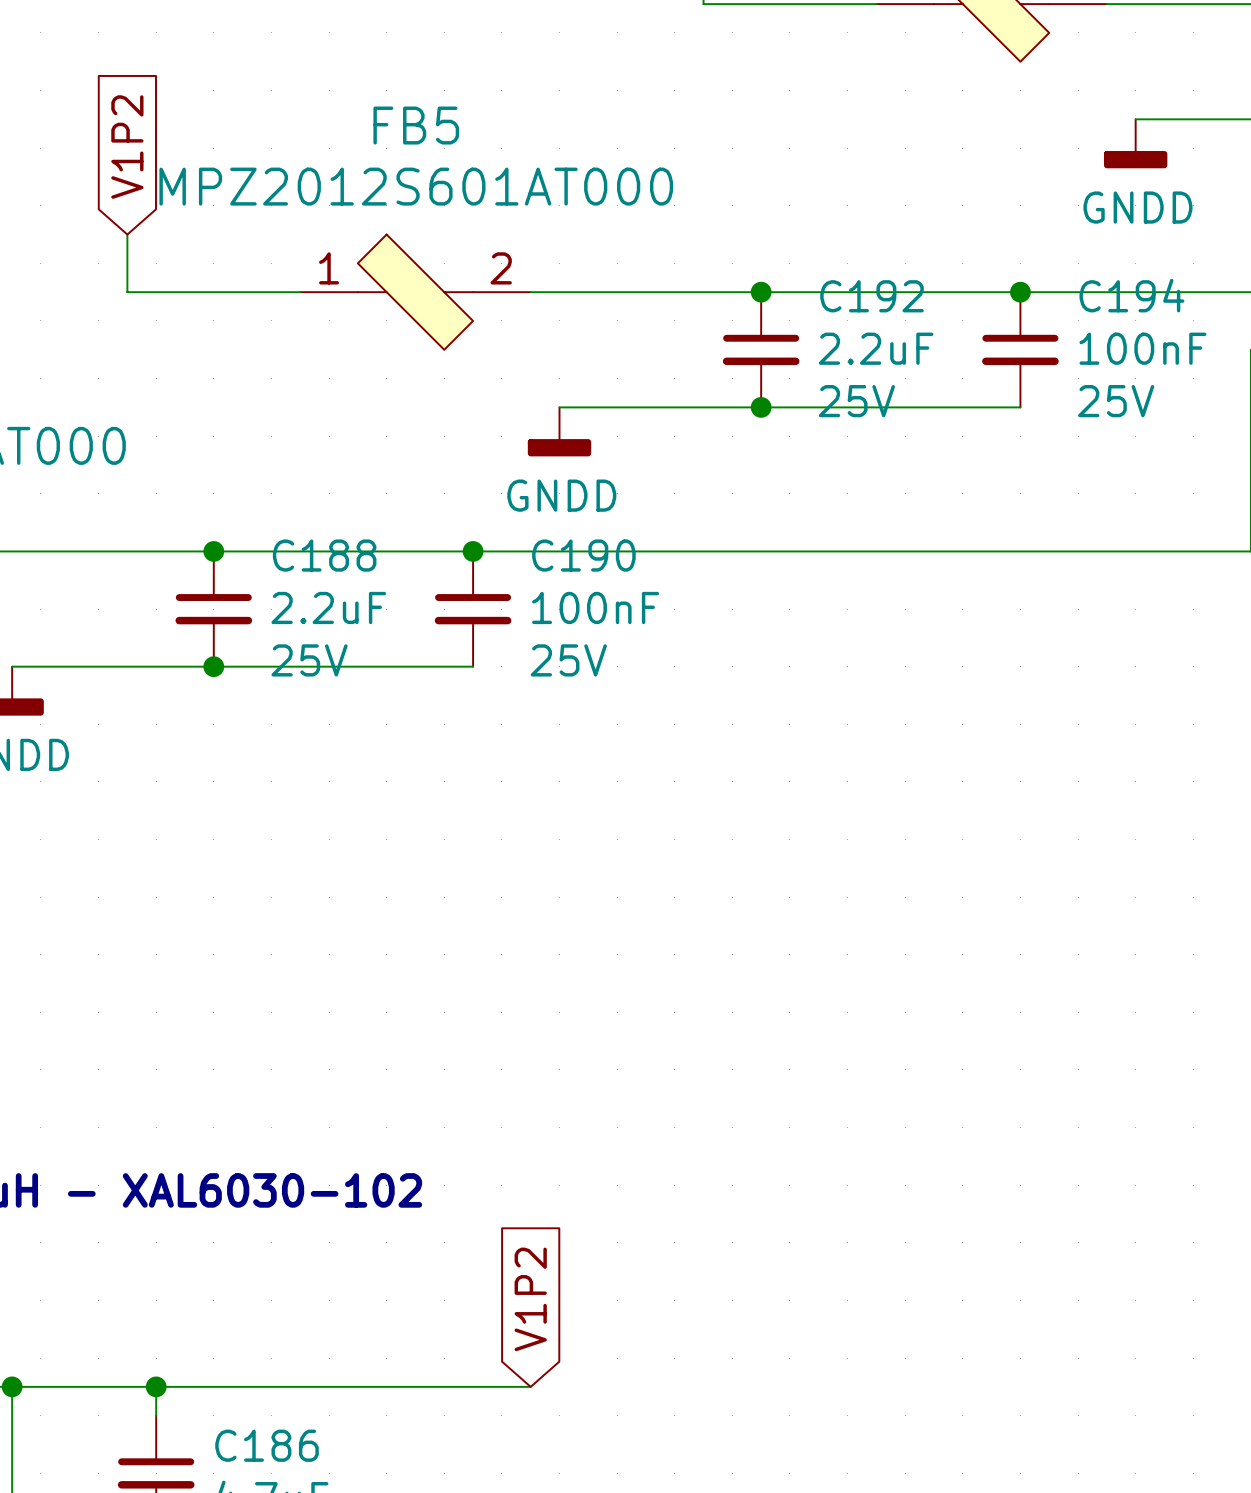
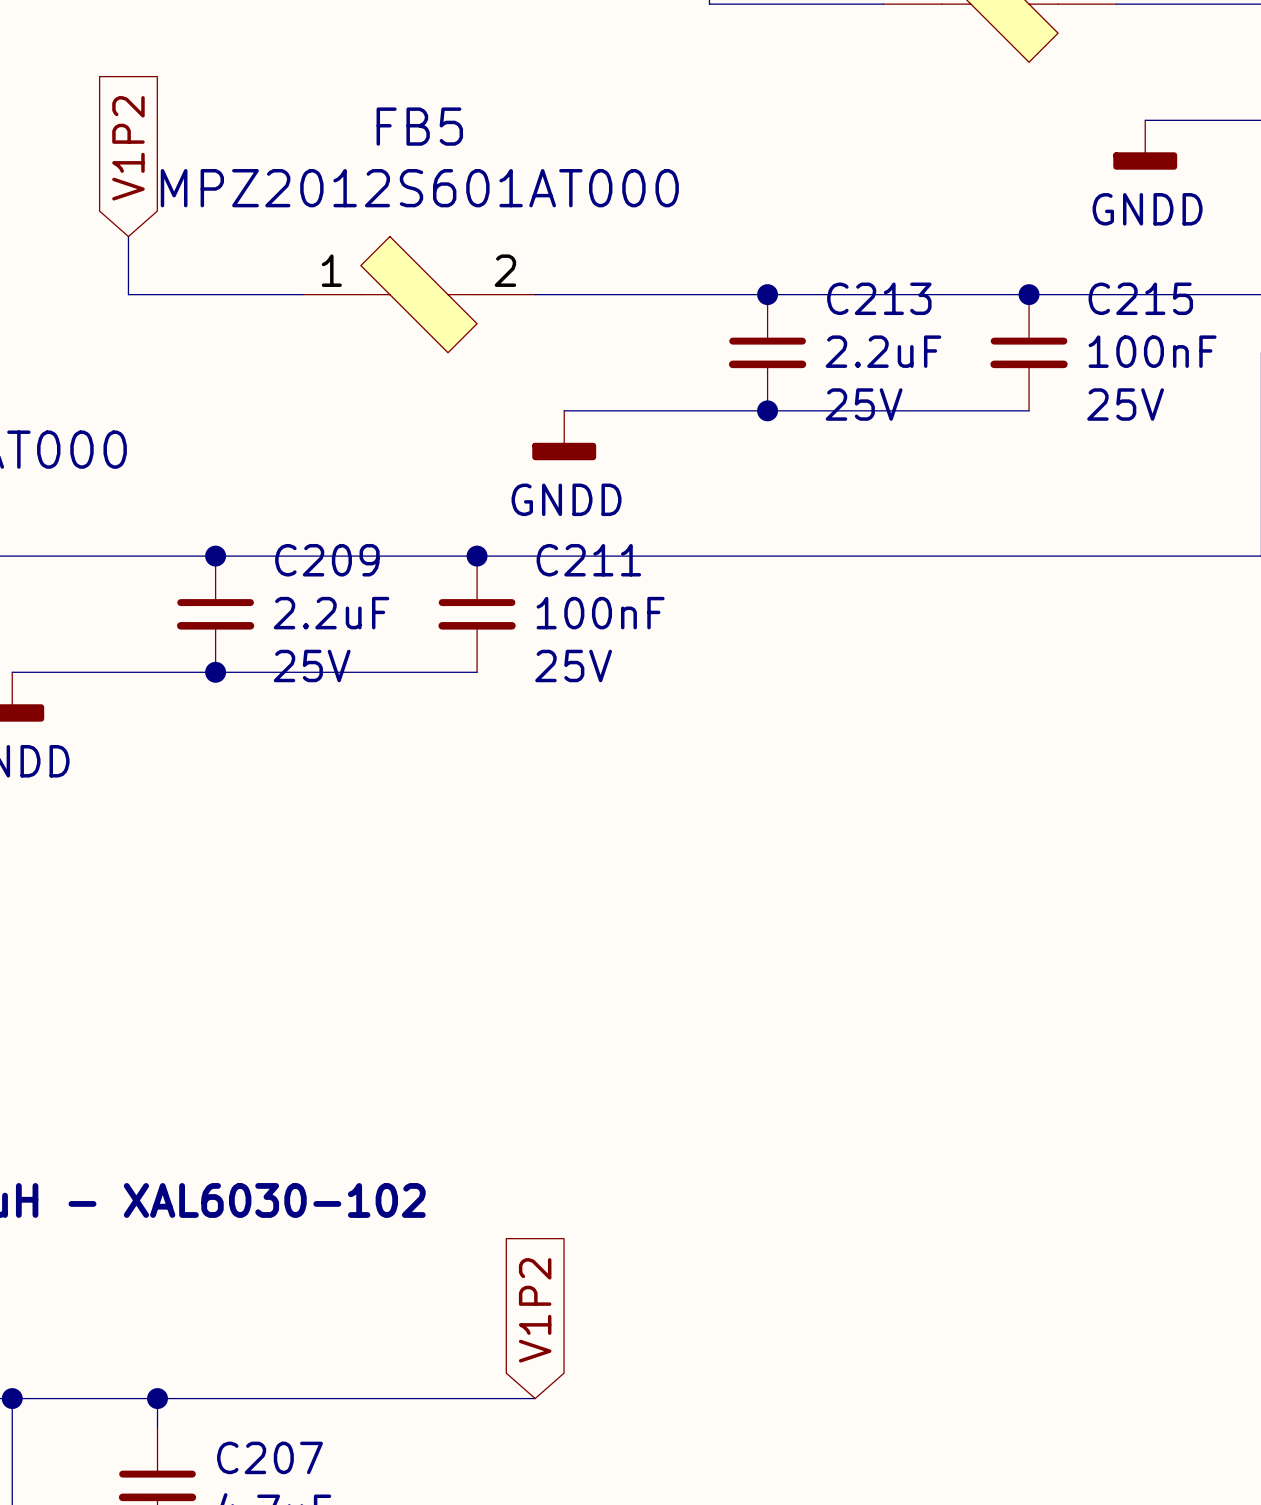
C194 name: C194 (1131, 295) -> C215 (1140, 298)
C192 name: C192 (872, 296) -> C213 (879, 298)
C188 name: C188 (324, 555) -> C209 (327, 560)
C190 name: C190 (583, 555) -> C211 (588, 560)
C186 name: C186 (267, 1445) -> C207 (269, 1457)

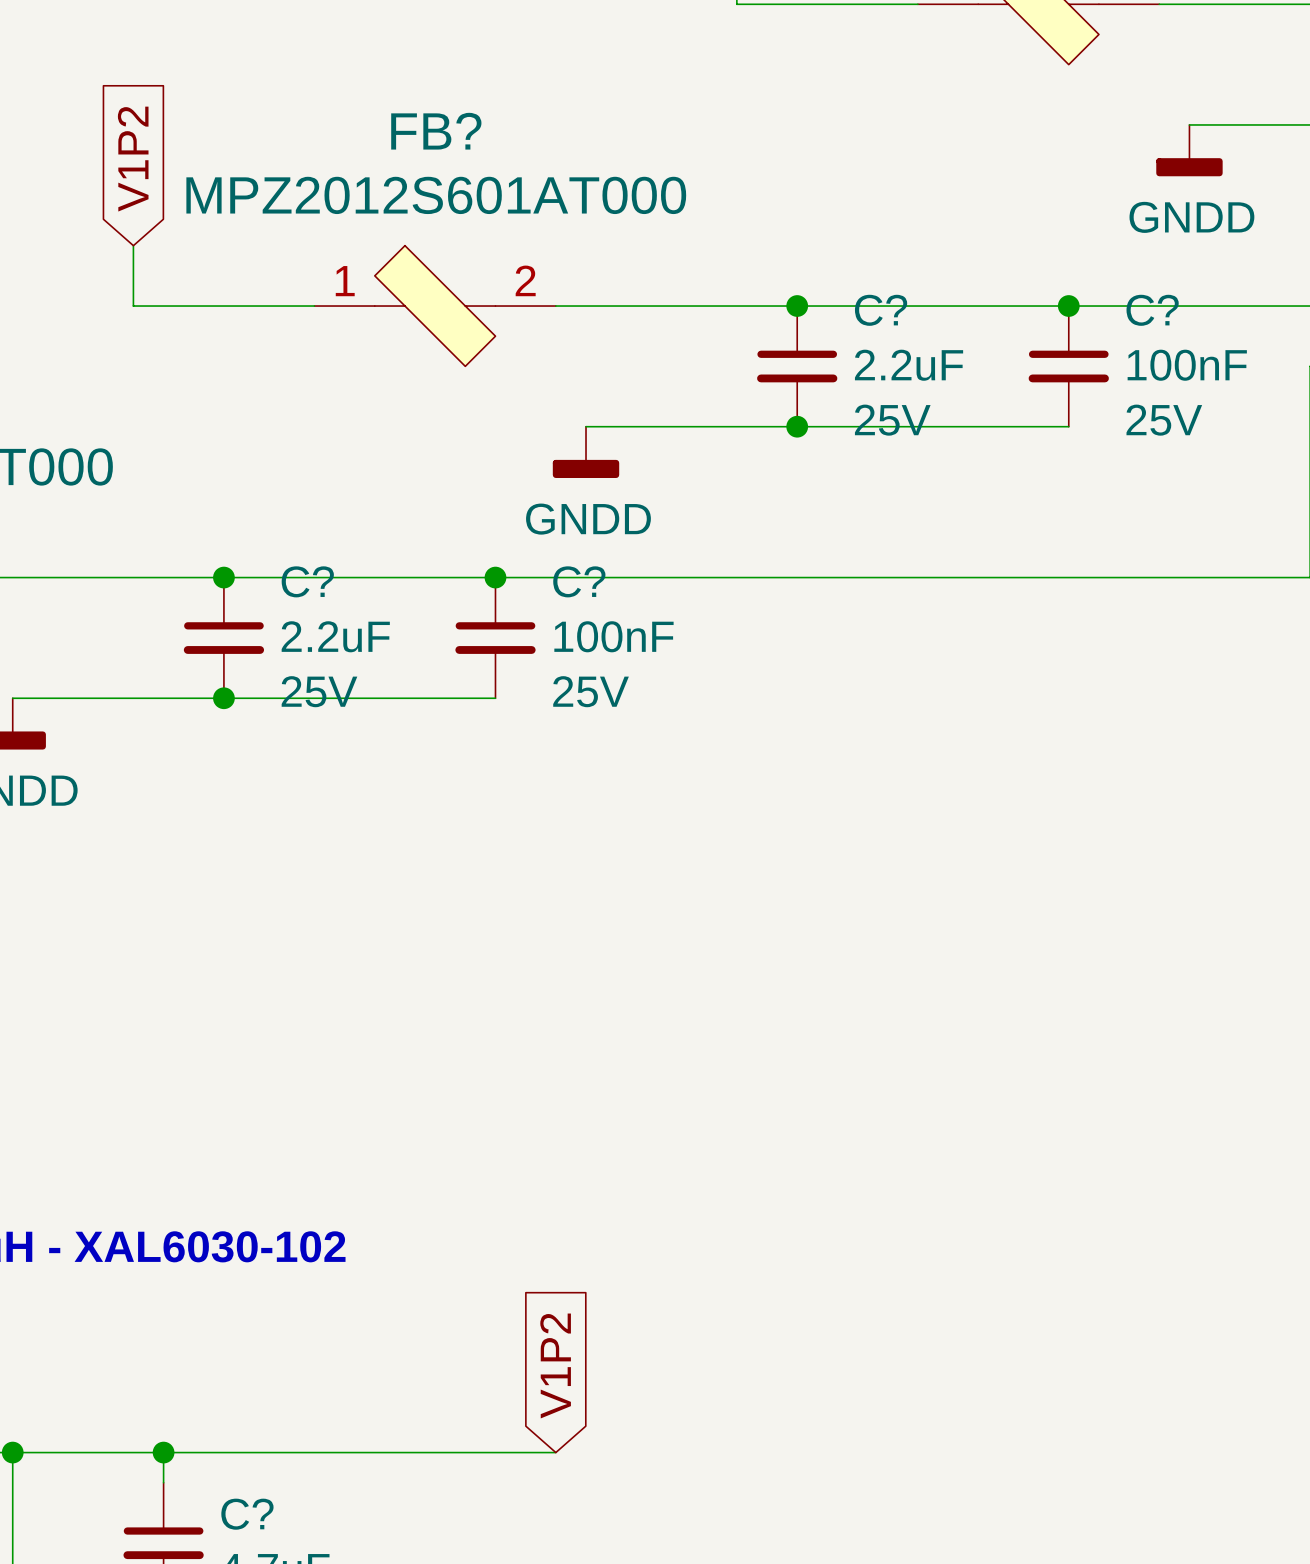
FB5 name: FB5 (419, 126) -> FB? (436, 131)
C213 name: C213 (879, 298) -> C? (881, 310)
C215 name: C215 (1140, 298) -> C? (1152, 310)
C209 name: C209 (327, 560) -> C? (307, 581)
C211 name: C211 (588, 560) -> C? (579, 581)
C207 name: C207 (269, 1457) -> C? (247, 1514)

